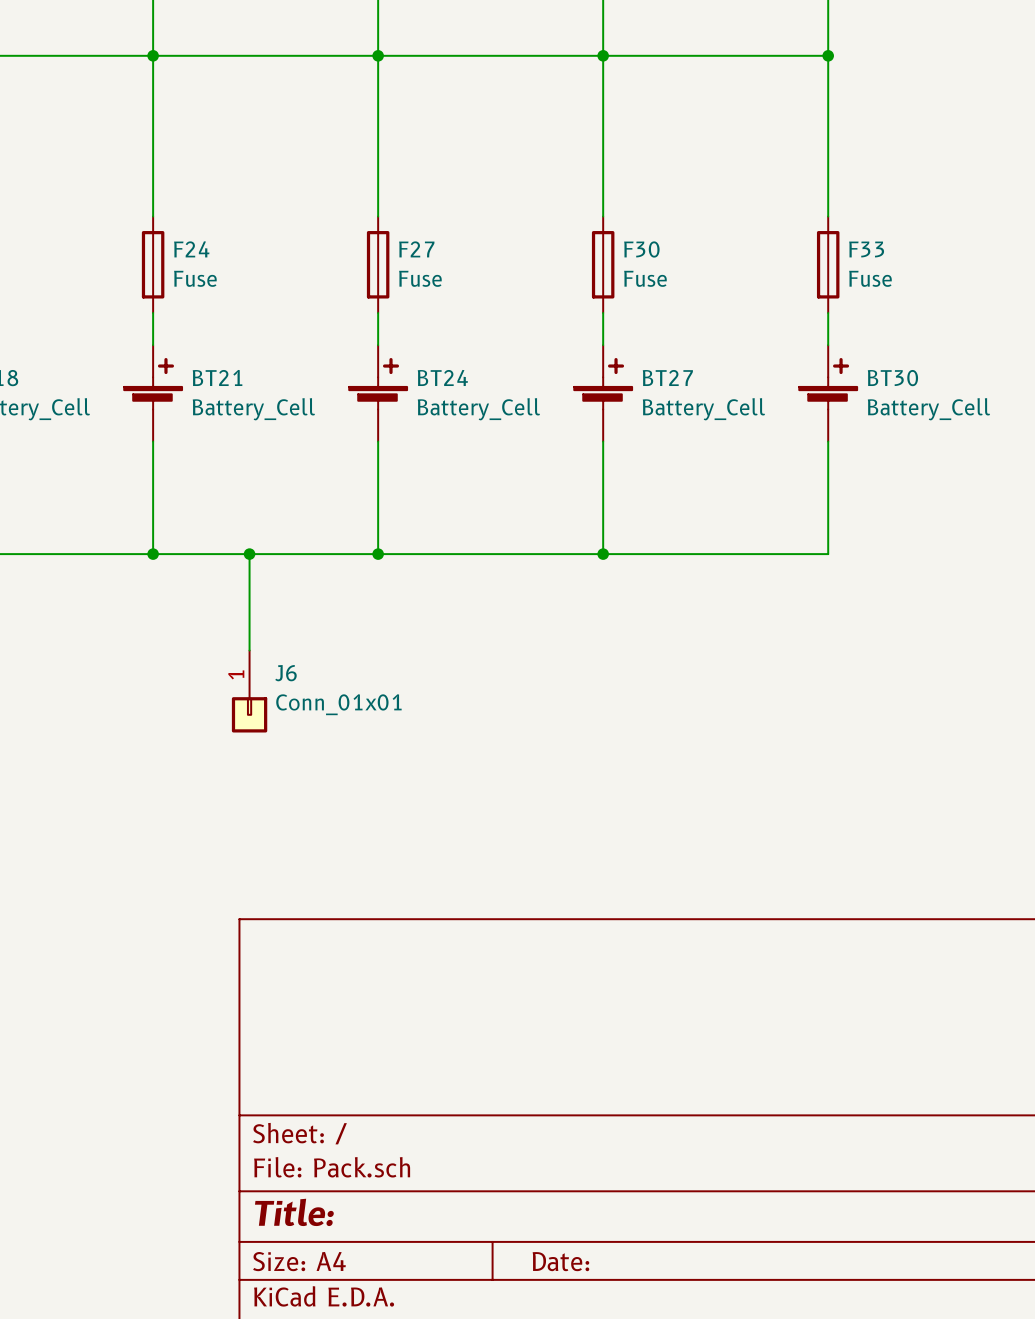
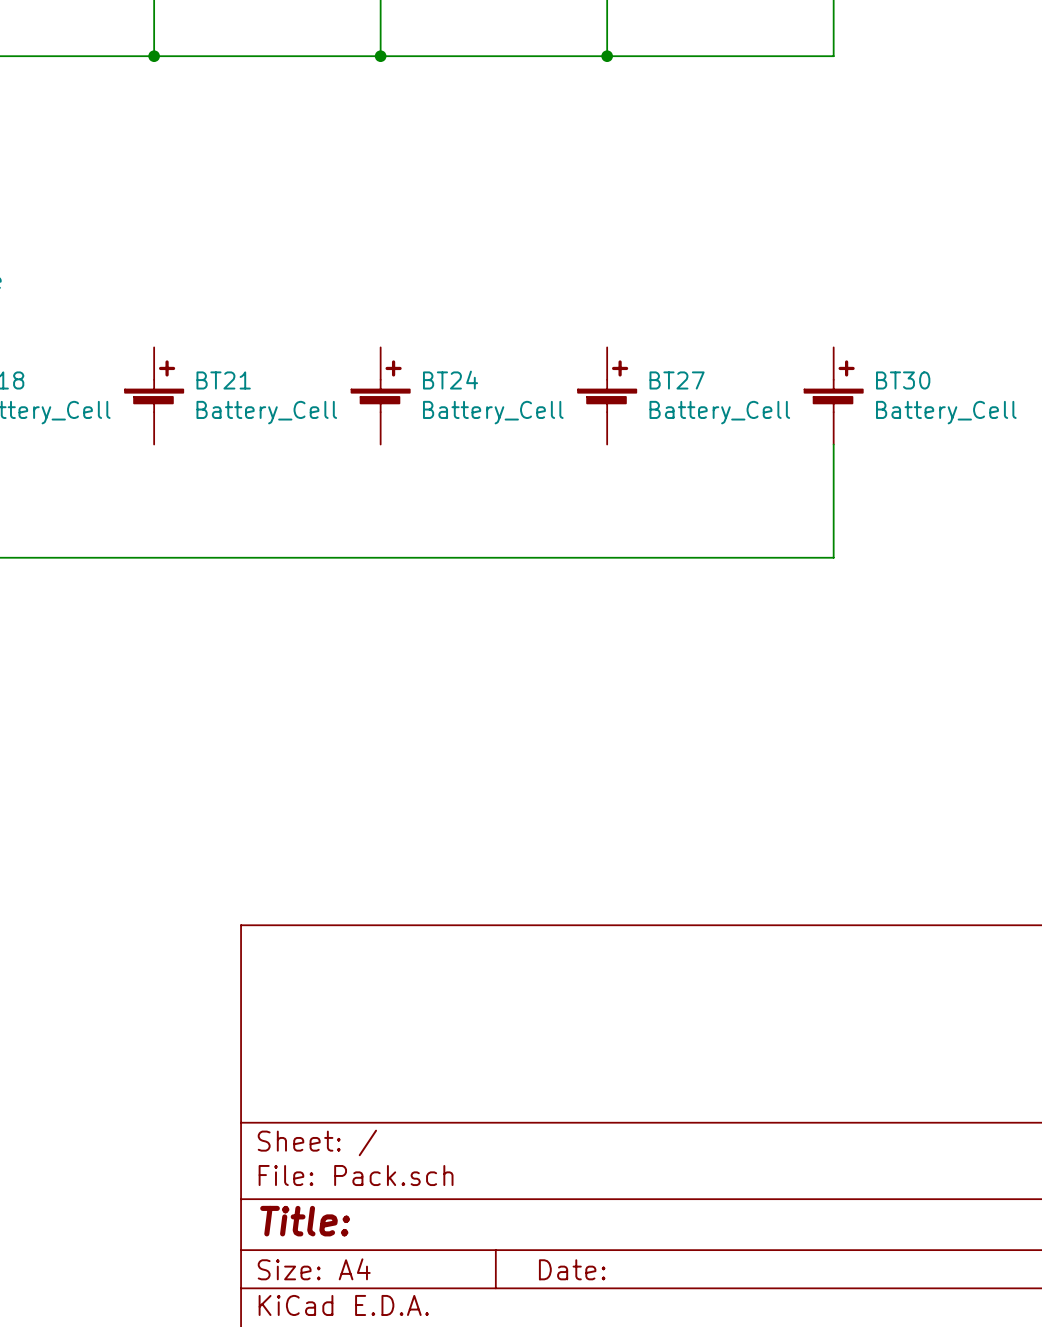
wire: (153, 55) (153, 216) -> none
wire: (378, 55) (378, 216) -> none
wire: (603, 55) (603, 216) -> none
wire: (828, 55) (828, 216) -> none
junction: (828, 55) -> none
F24: Fuse (153, 264) -> none
F27: Fuse (378, 264) -> none
F30: Fuse (603, 264) -> none
F33: Fuse (828, 264) -> none
wire: (153, 312) (153, 345) -> none
wire: (378, 312) (378, 345) -> none
wire: (603, 312) (603, 345) -> none
wire: (828, 312) (828, 345) -> none
wire: (153, 441) (153, 554) -> none
wire: (378, 441) (378, 554) -> none
wire: (603, 441) (603, 554) -> none
junction: (153, 554) -> none
wire: (249, 554) (249, 650) -> none
junction: (249, 554) -> none
junction: (378, 554) -> none
junction: (603, 554) -> none
J6: Conn_01x01 (249, 691) -> none

